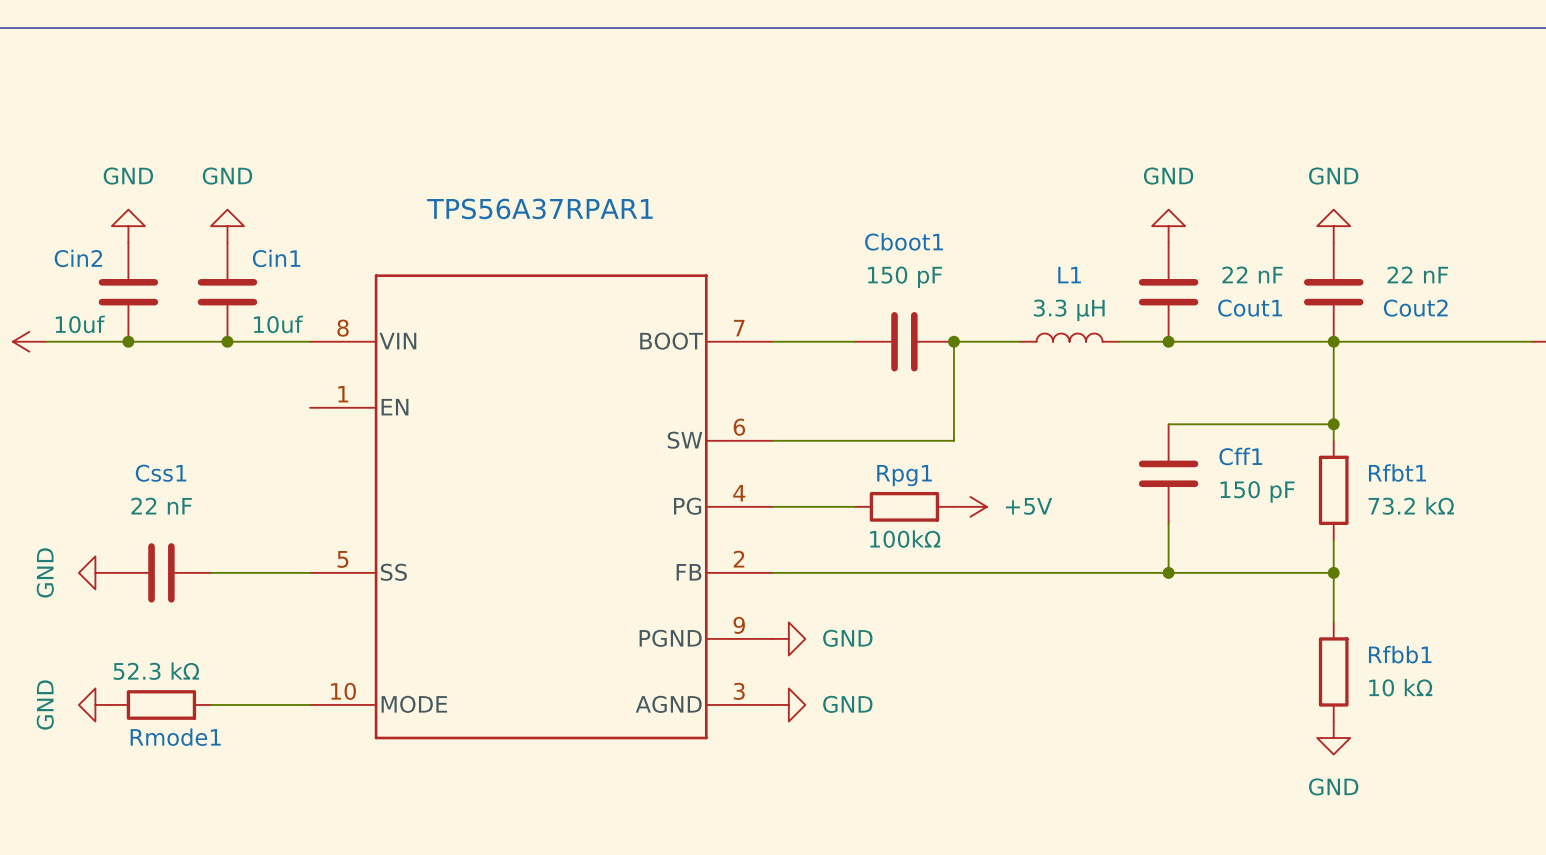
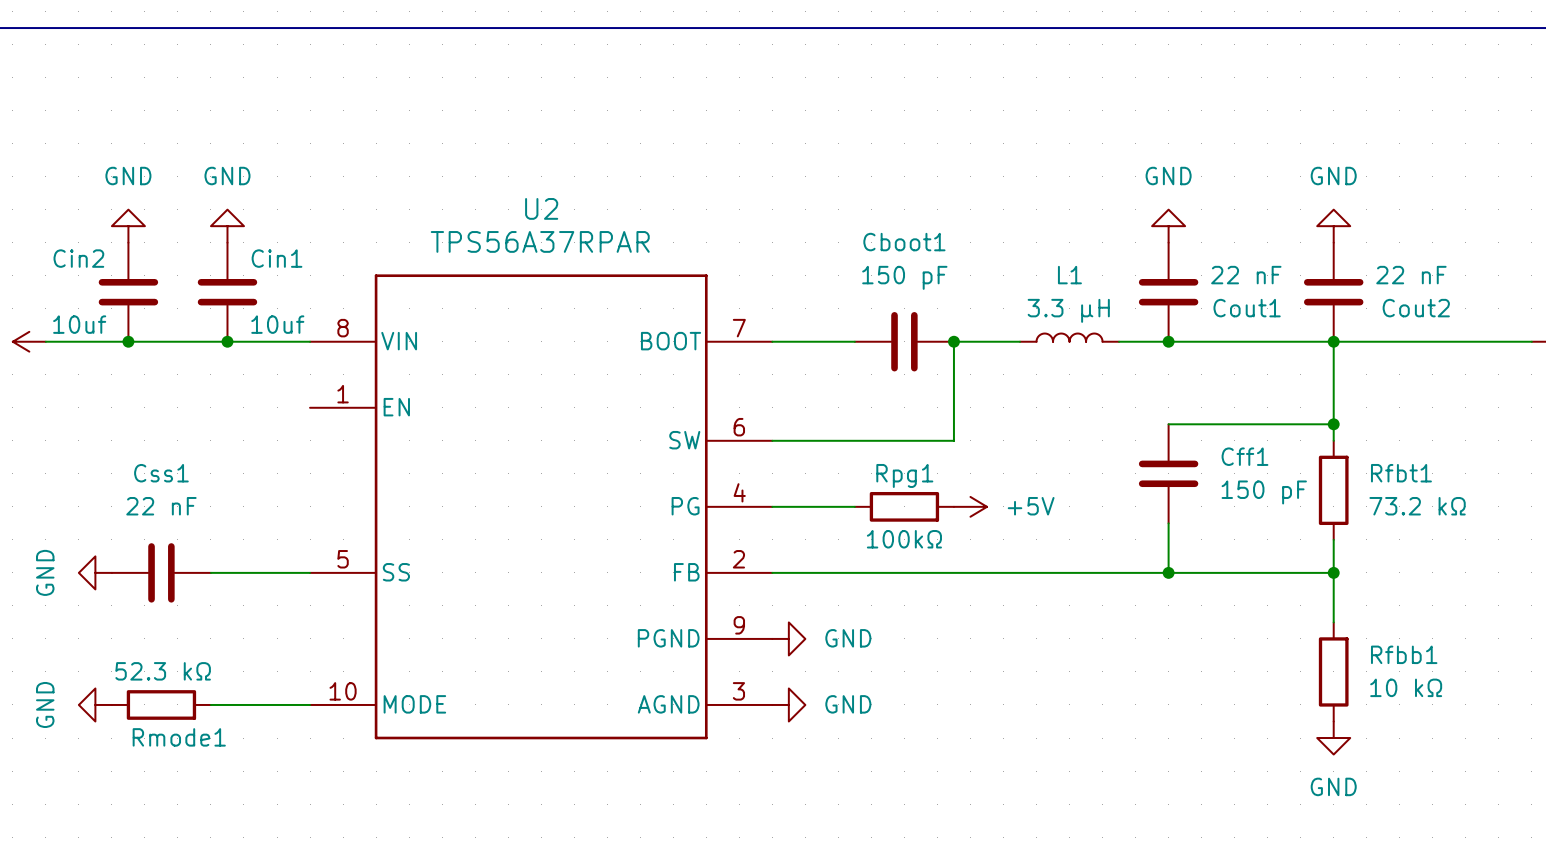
TPS56A37RPAR1 name: TPS56A37RPAR1 (539, 208) -> U2 (541, 208)
TPS56A37RPAR1 value: none -> TPS56A37RPAR (540, 241)

